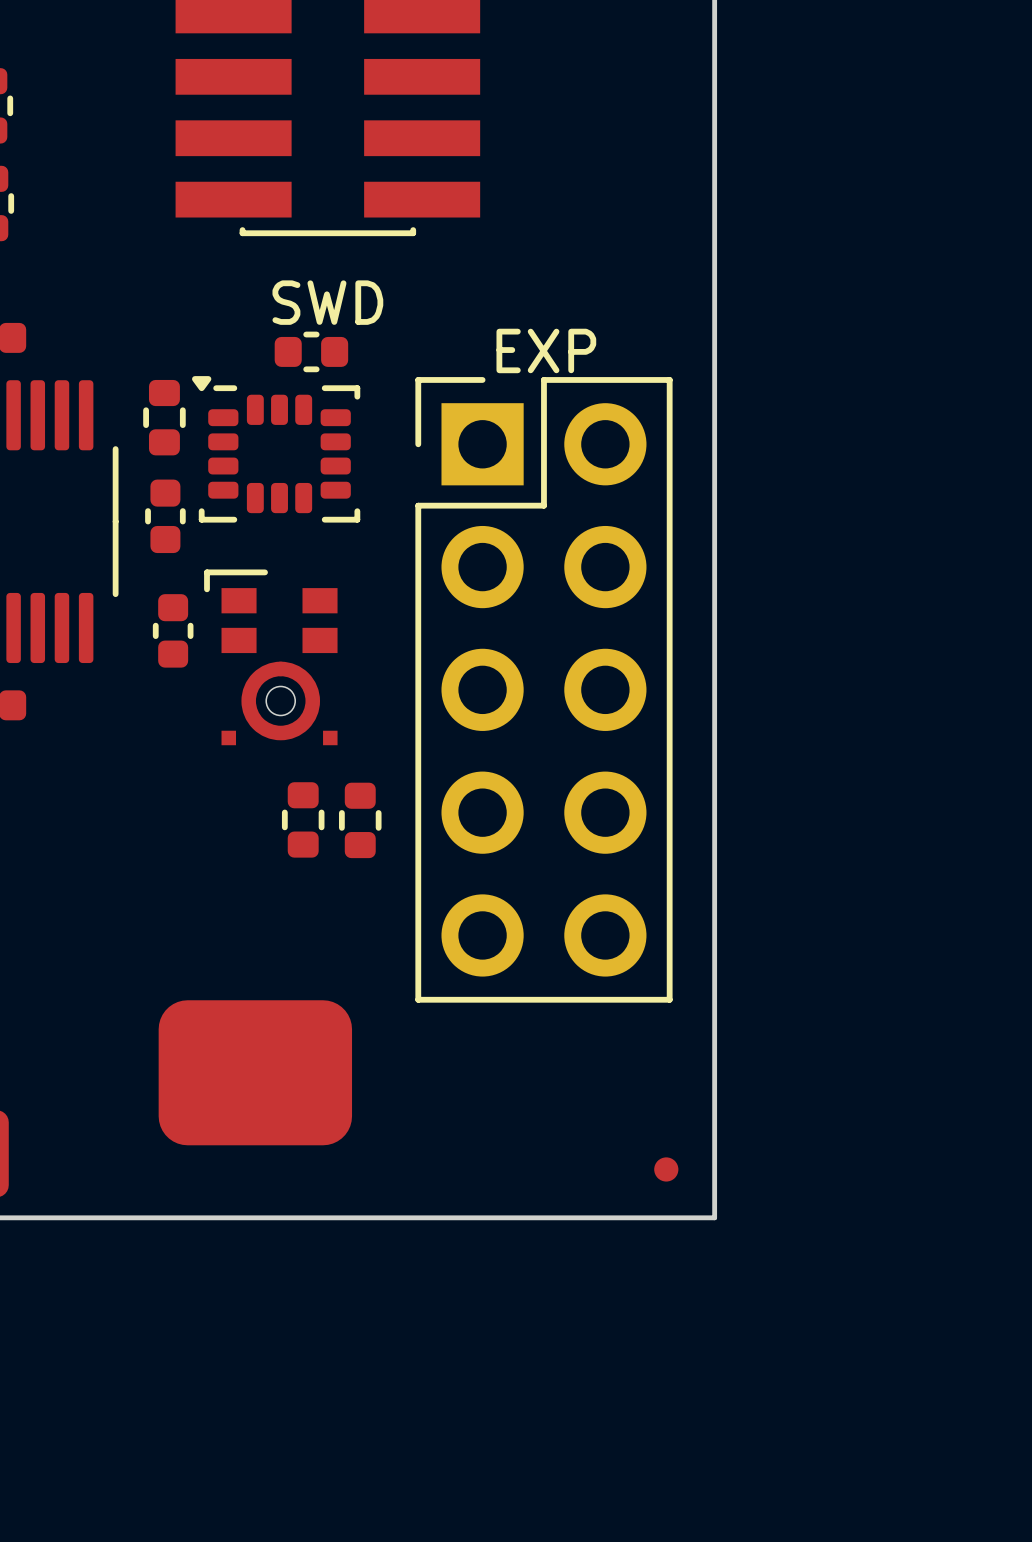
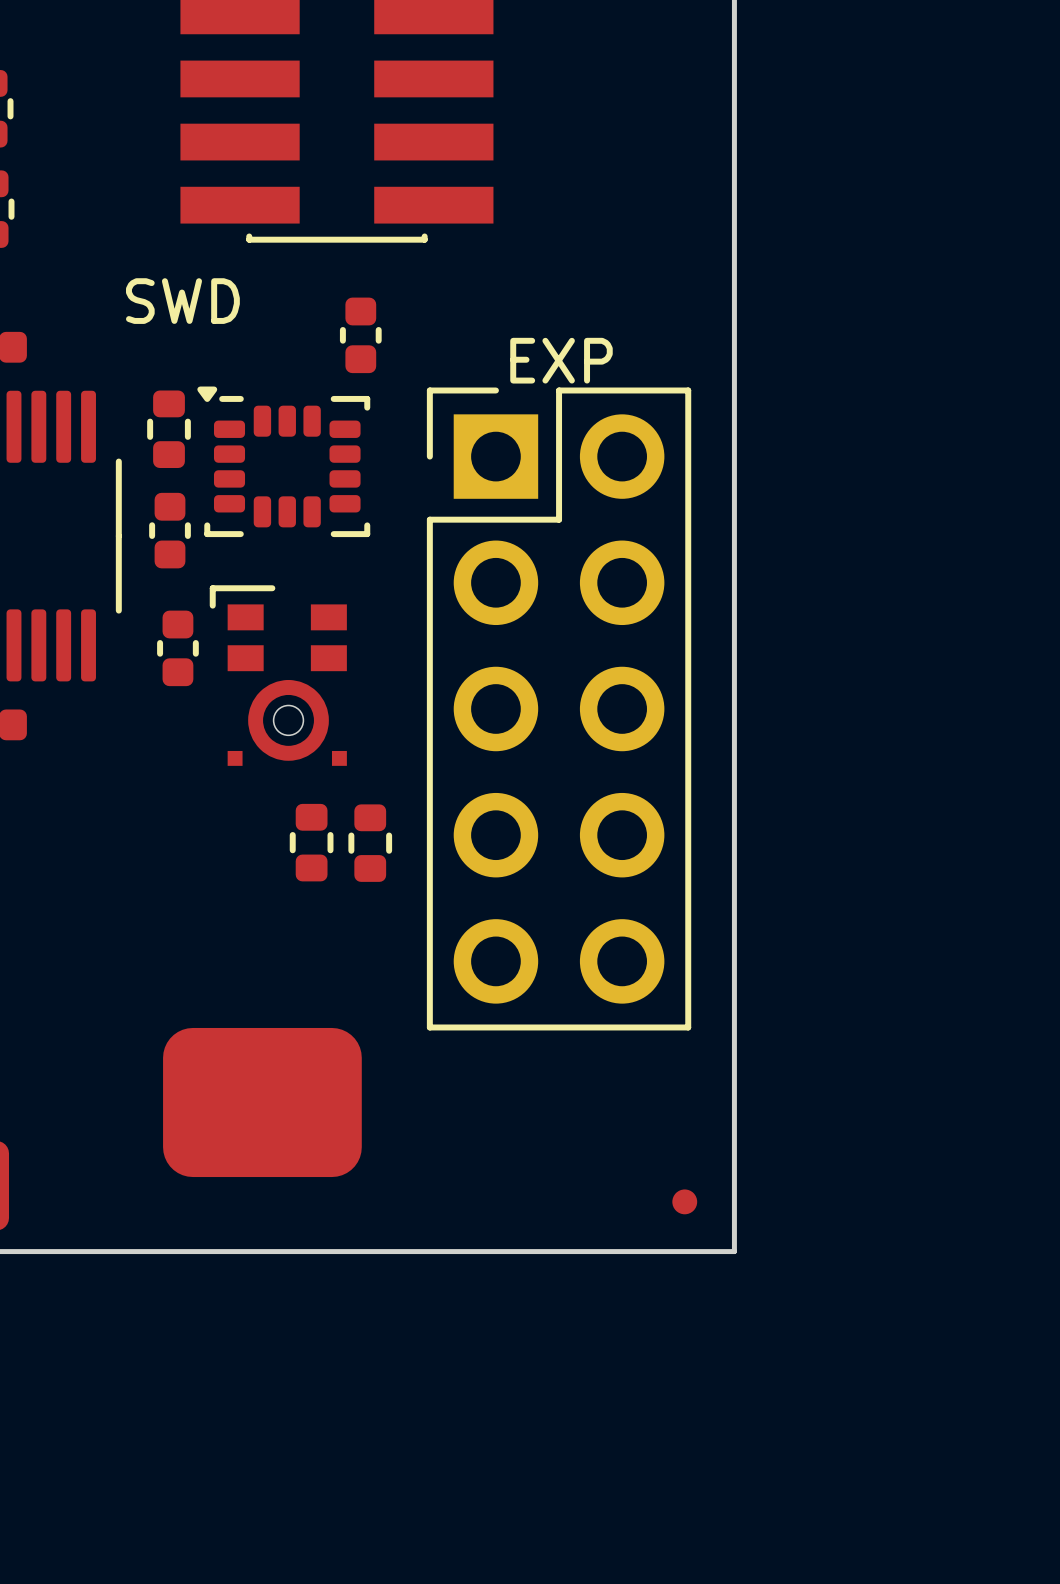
text position: SWD (327, 302) -> SWD (182, 301)
part rotation: 0° (311, 351) -> 90° clockwise (360, 335)
part position: (311, 351) -> (360, 335)

